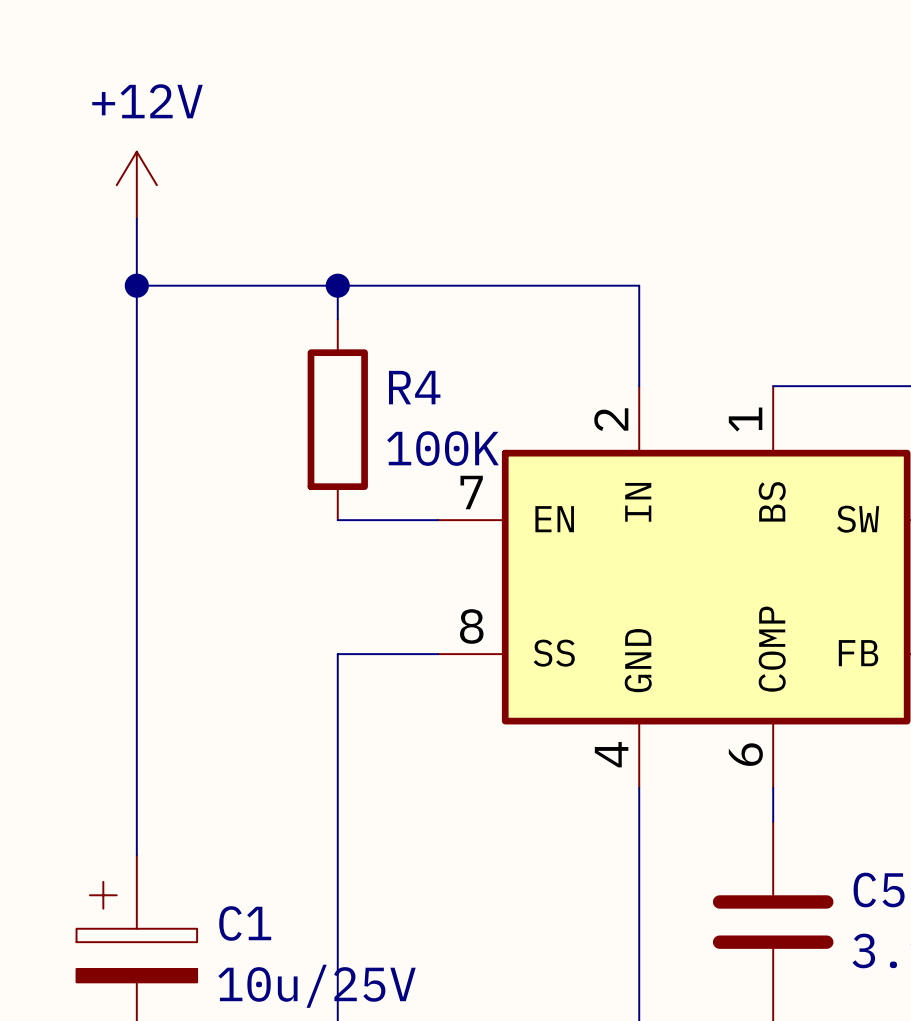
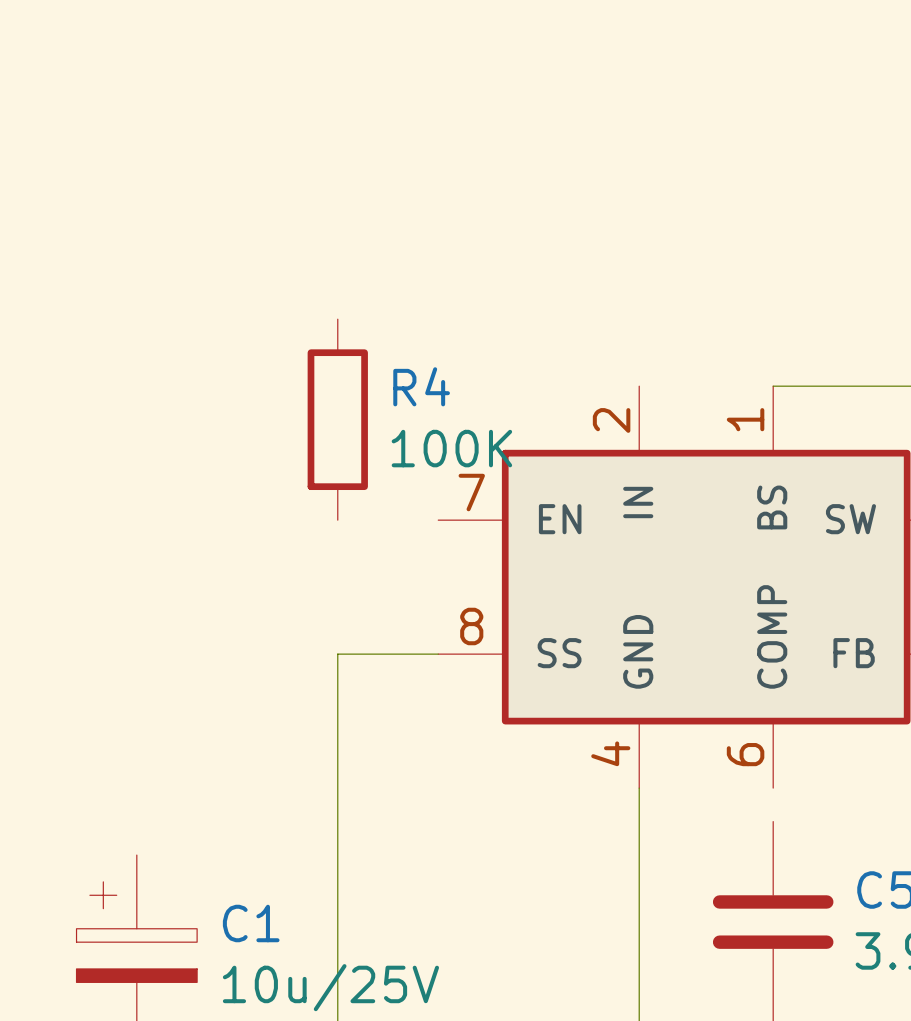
power symbol: +12V (136, 185) -> none
wire: (136, 218) (136, 855) -> none
wire: (136, 285) (639, 285) (639, 386) -> none
junction: (136, 285) -> none
wire: (337, 285) (337, 319) -> none
junction: (337, 285) -> none
wire: (337, 520) (438, 520) -> none
wire: (773, 788) (773, 821) -> none

